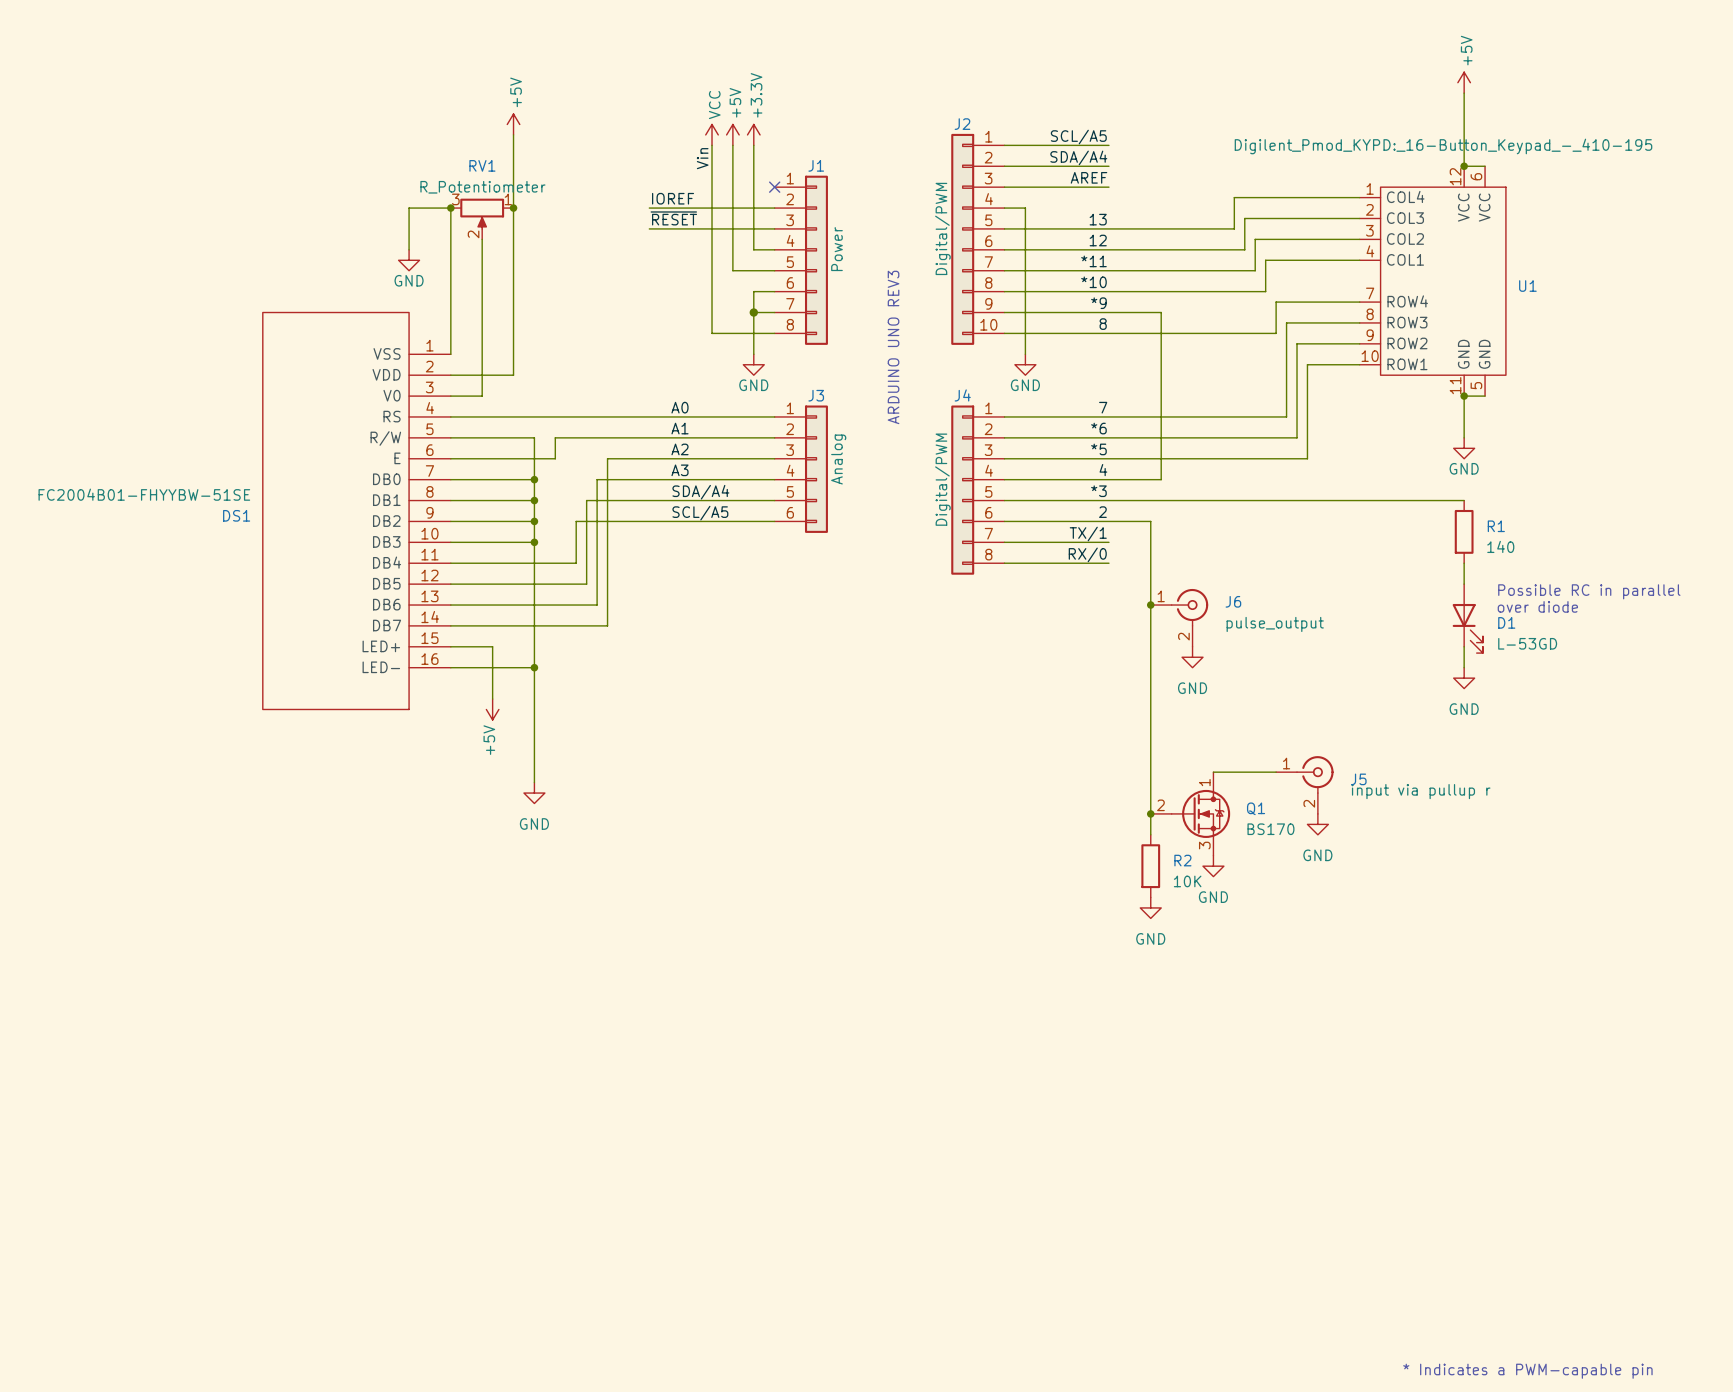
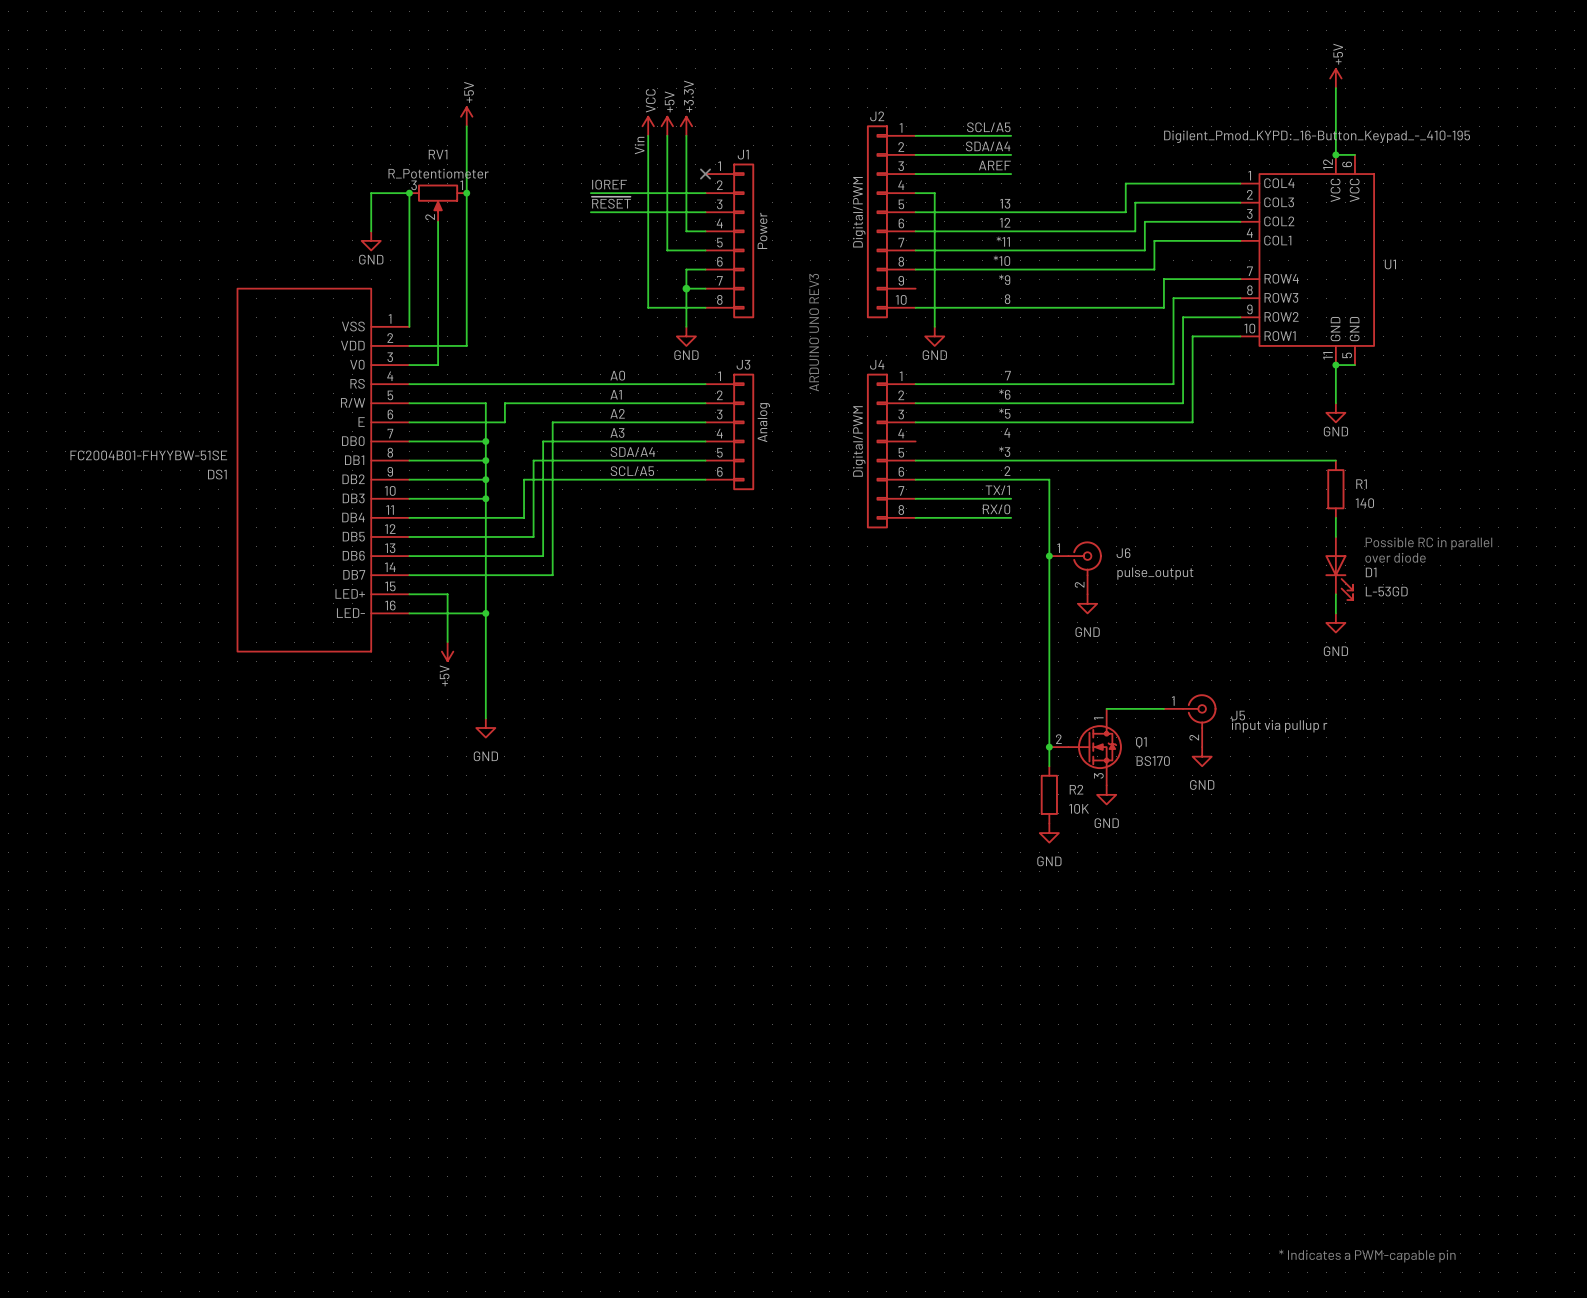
wire: (1004, 312) (1161, 312) (1161, 479) (1004, 479) -> none

